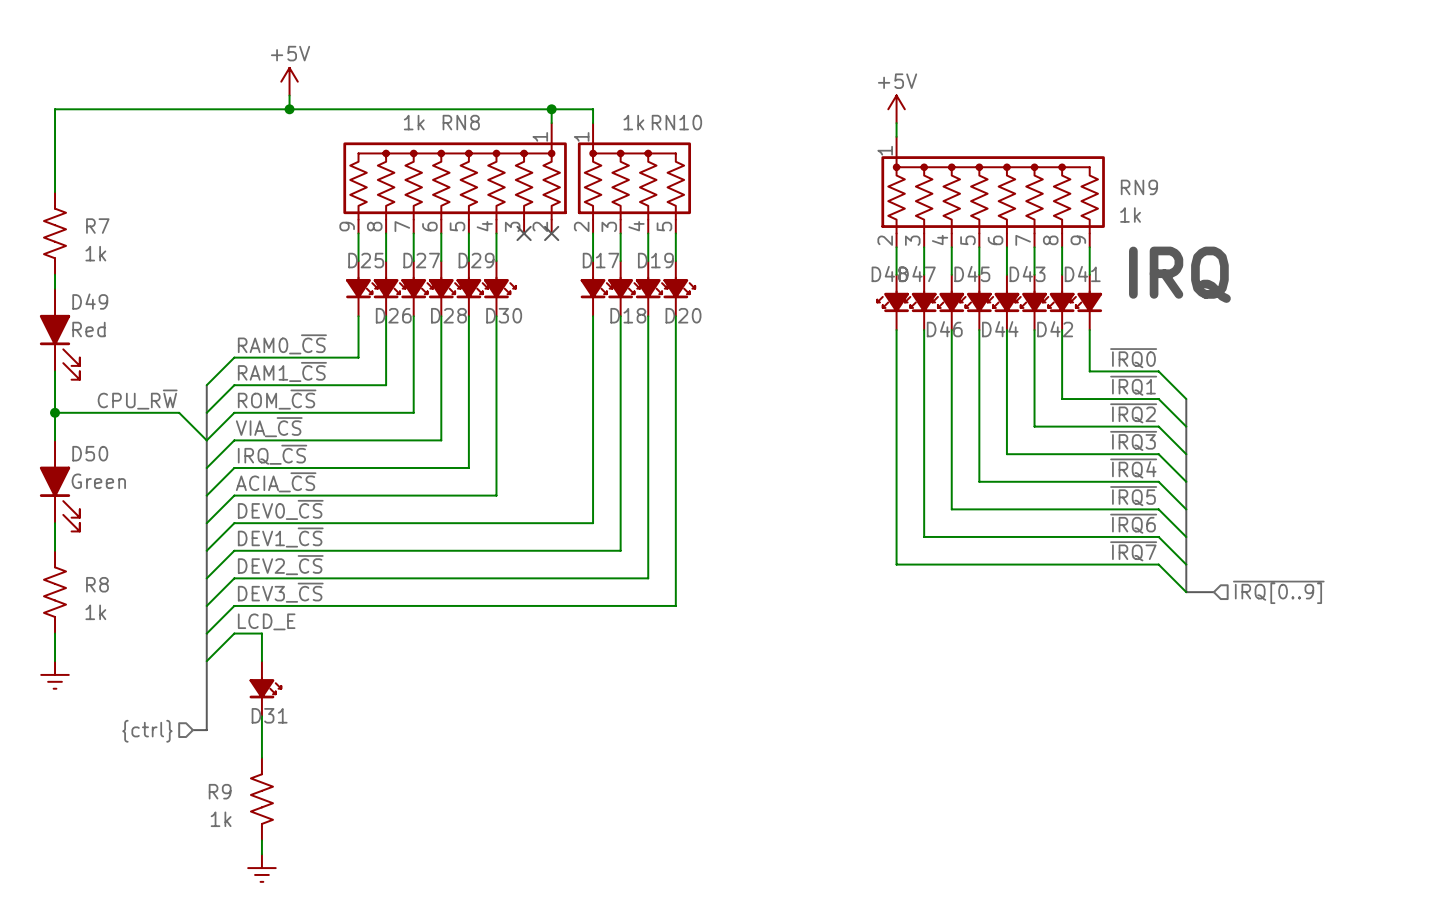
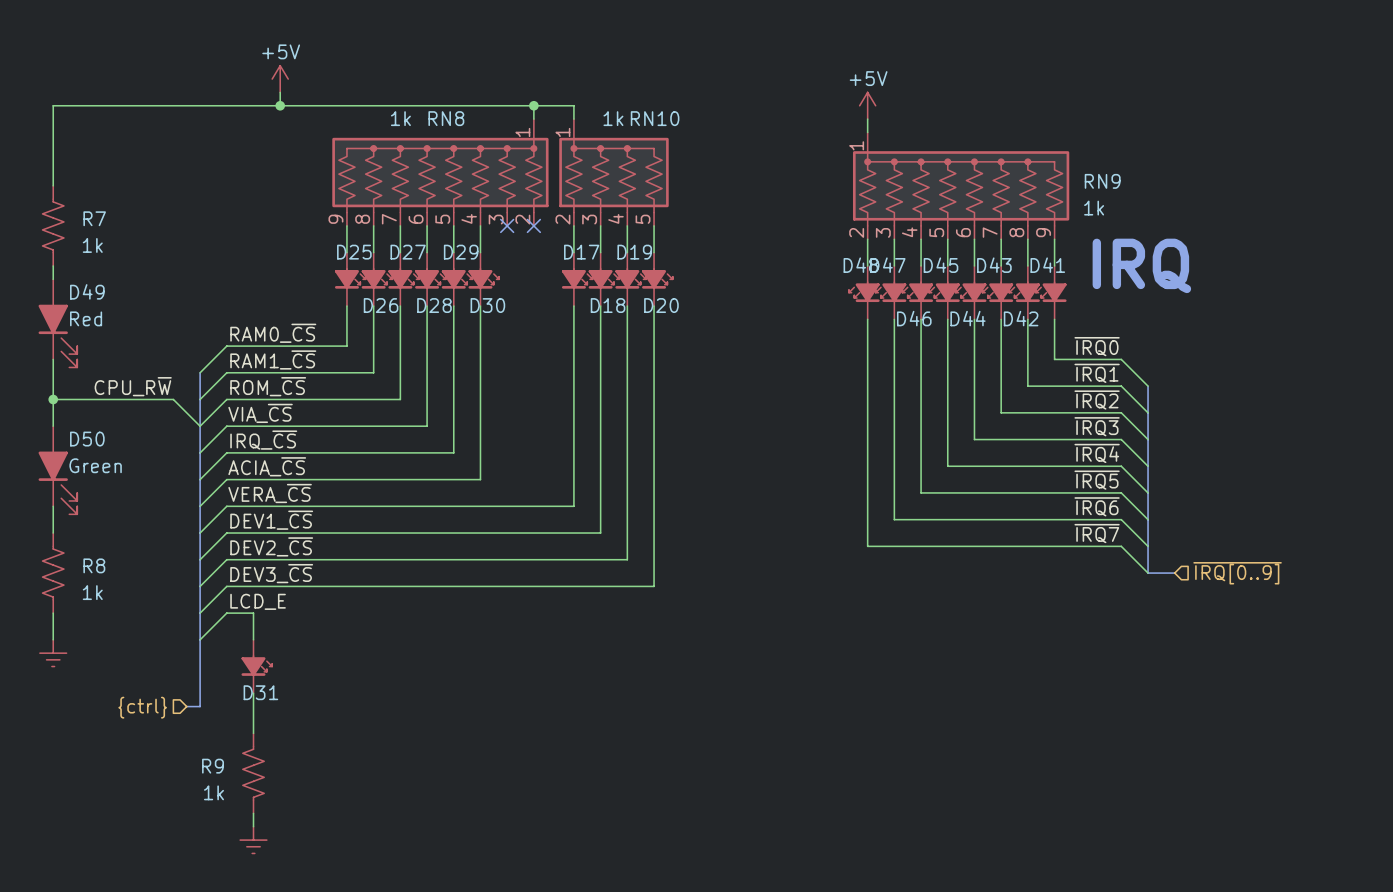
label: DEV0_~{CS} (280, 509) -> VERA_~{CS} (270, 493)

